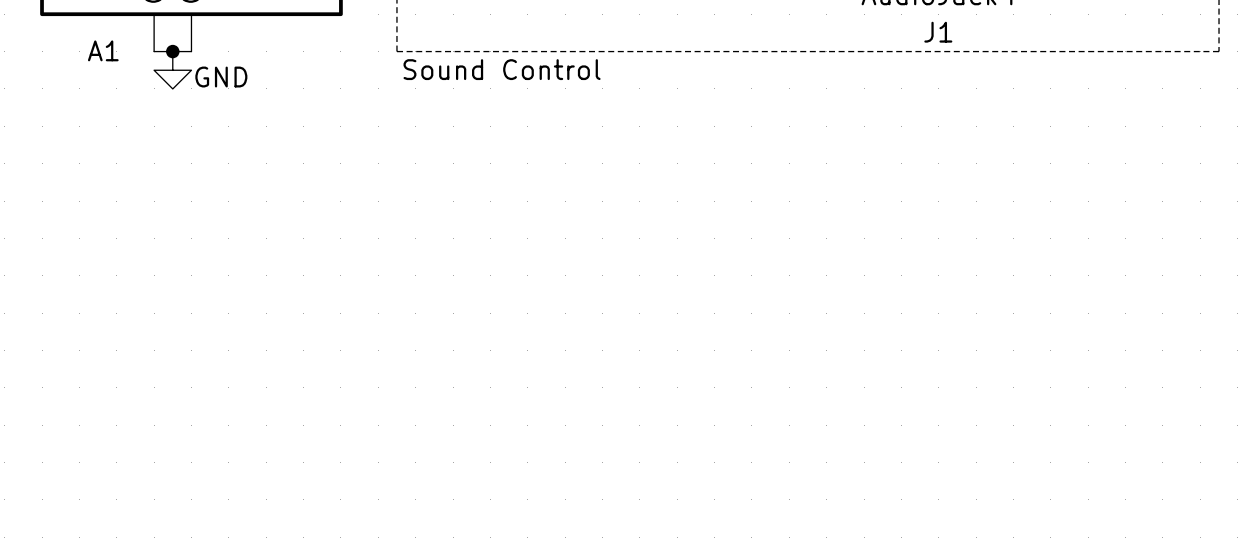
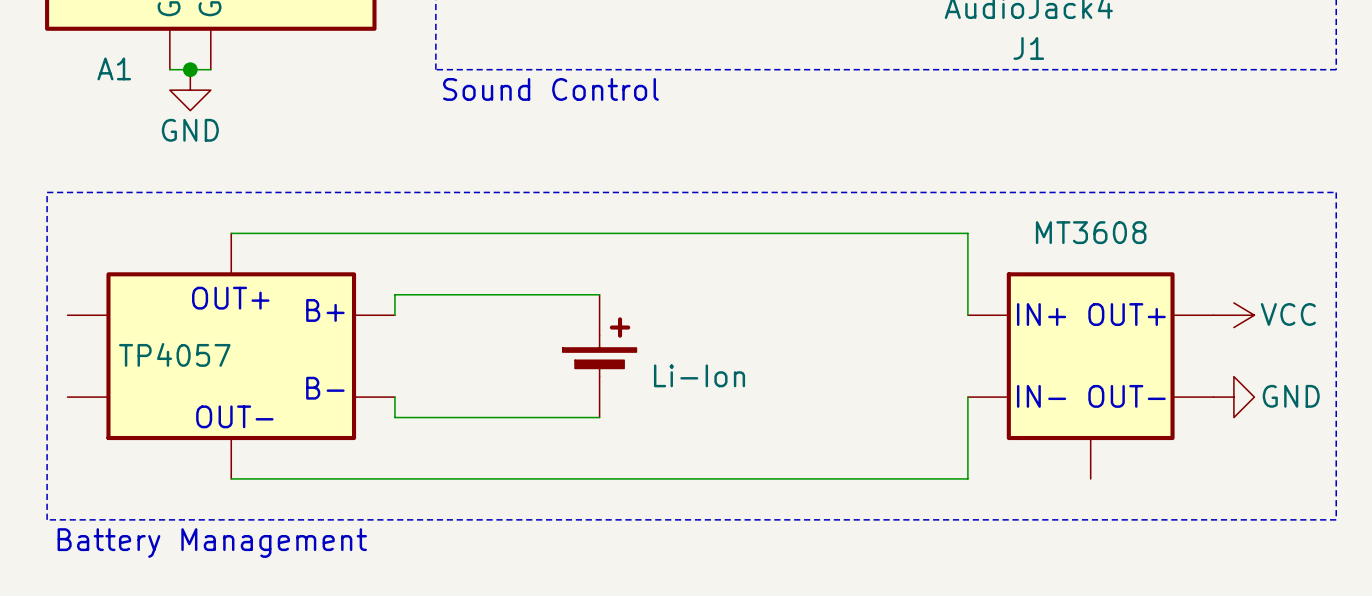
power symbol text position: GND (221, 77) -> GND (190, 130)
line: none -> (47, 192) (1336, 192) (1336, 519) (47, 519) (47, 192)
wire: none -> (231, 233) (967, 233) (967, 315)
wire: none -> (599, 294) (394, 294) (394, 315)
text: none -> OUT+ (230, 298)
text: none -> B+ (325, 310)
text: none -> IN+ (1041, 314)
text: none -> OUT+ (1127, 314)
power symbol: none -> VCC (1233, 315)
part: none -> TP4057 (231, 356)
Li-Ion: none -> (599, 356)
part: none -> MT3608 (1090, 375)
text: none -> B- (325, 388)
text: none -> IN- (1041, 396)
text: none -> OUT- (1127, 396)
wire: none -> (394, 397) (394, 417) (599, 417)
wire: none -> (967, 397) (967, 478) (231, 478)
power symbol: none -> GND (1233, 397)
text: none -> OUT- (234, 416)
text: none -> Battery Management (212, 543)

